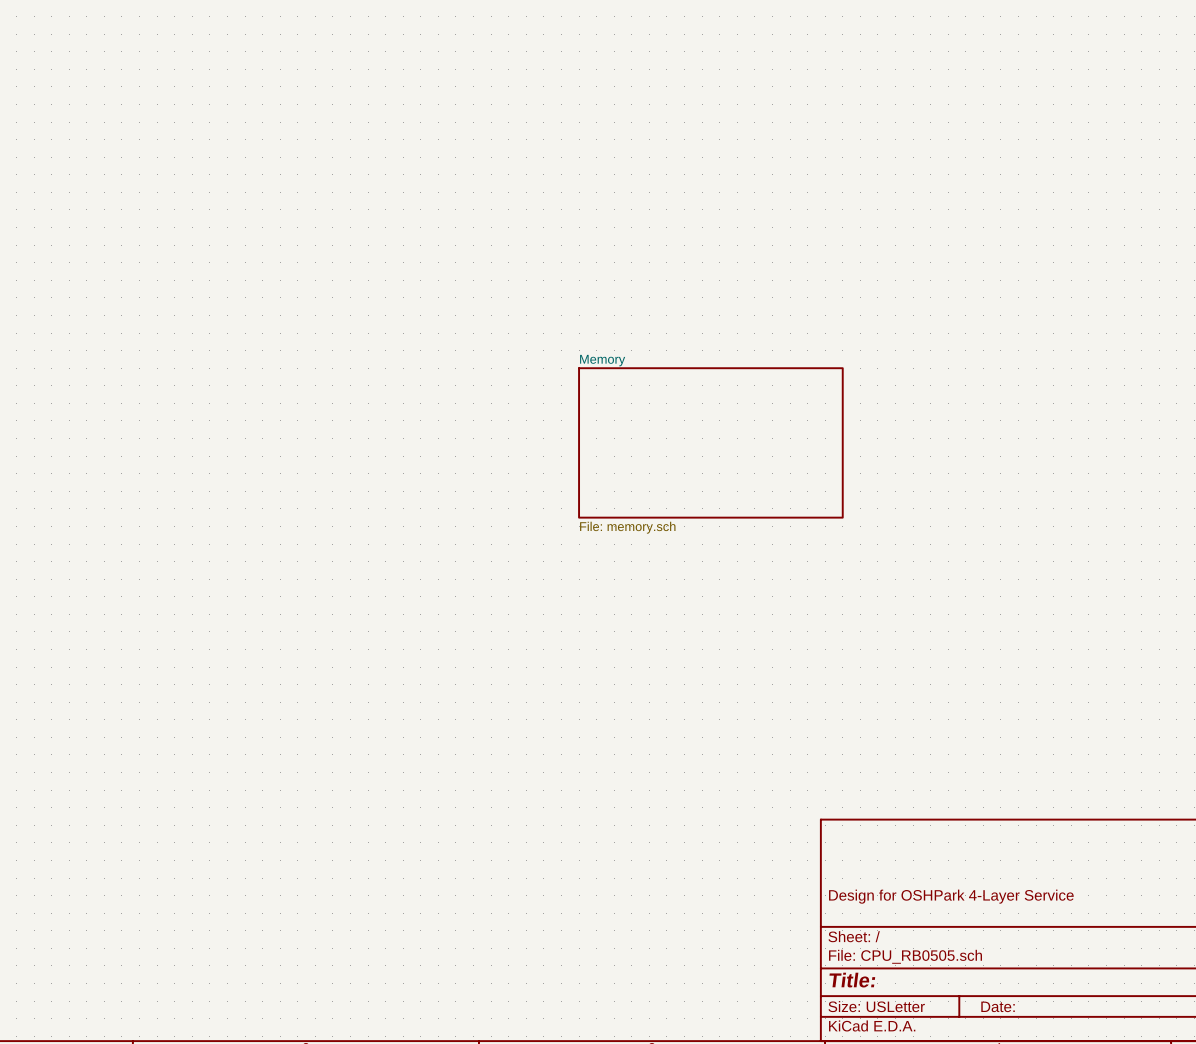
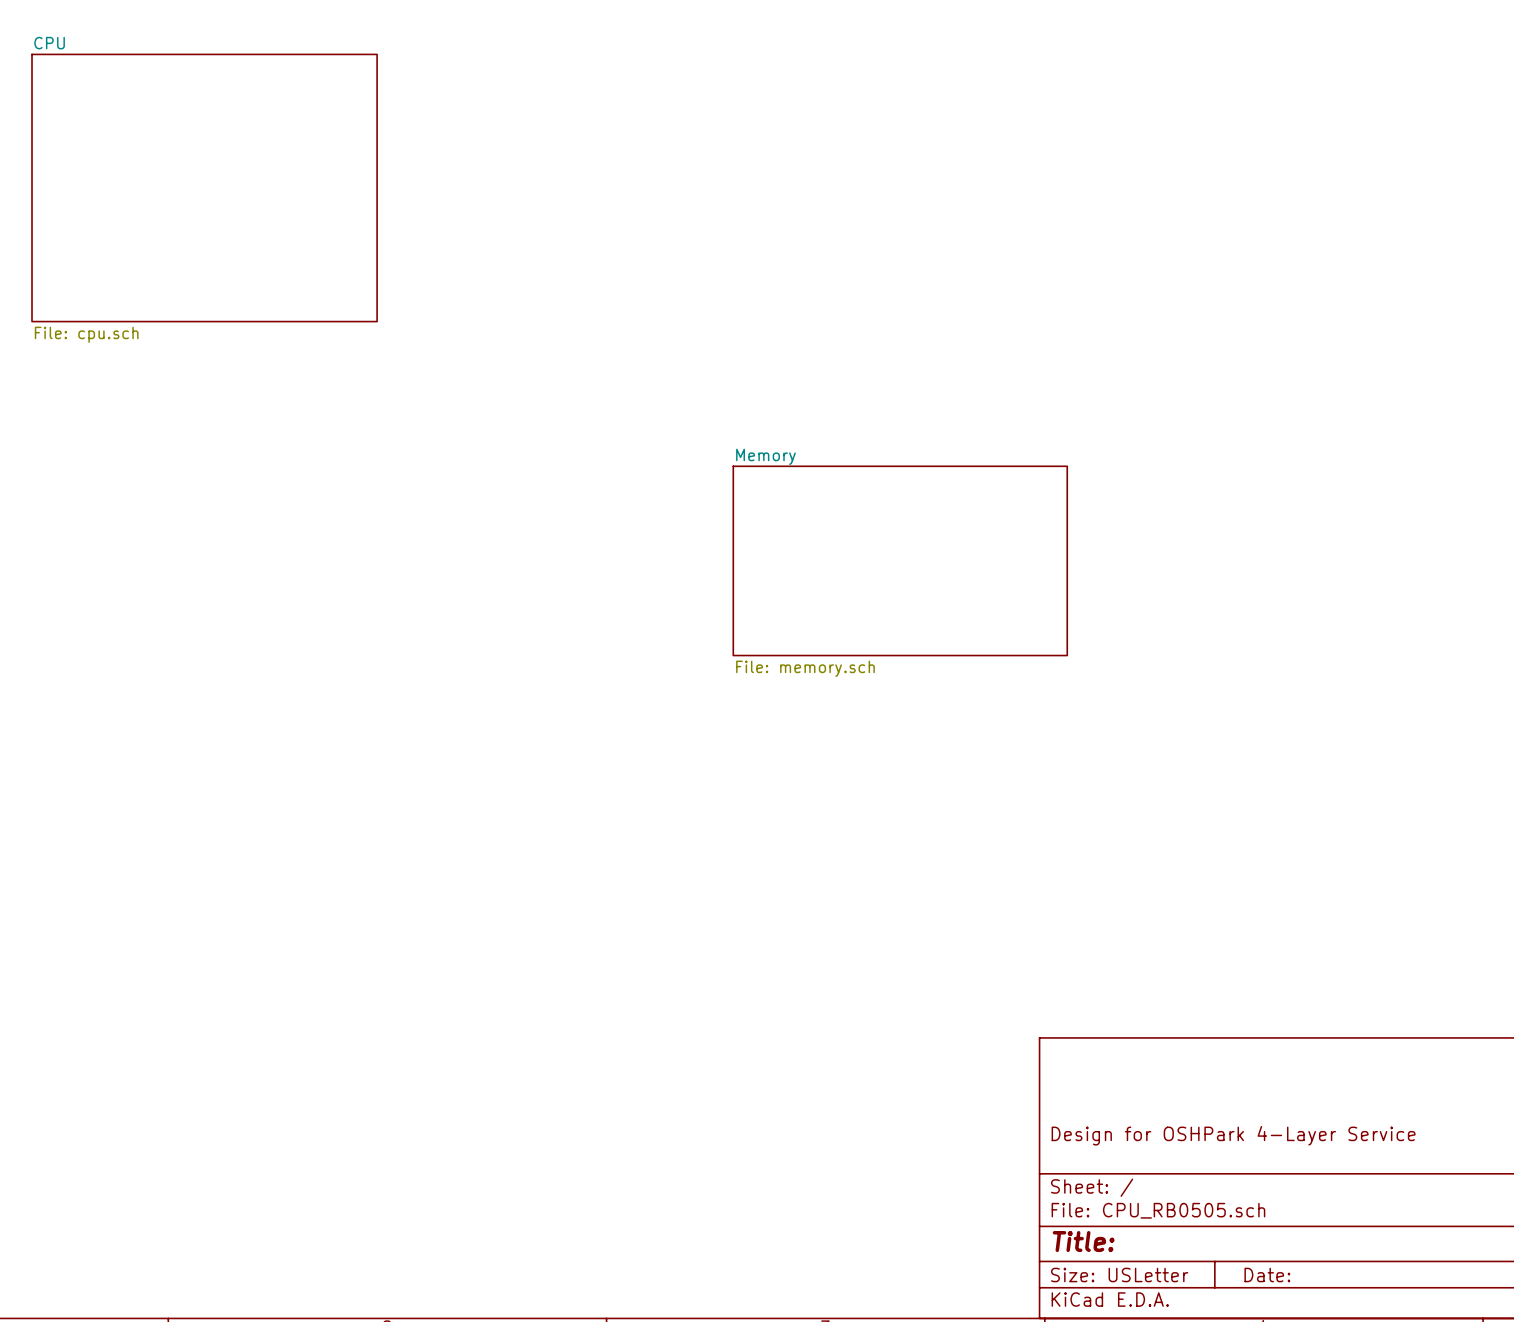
sheet CPU: none -> File: cpu.sch (204, 188)

